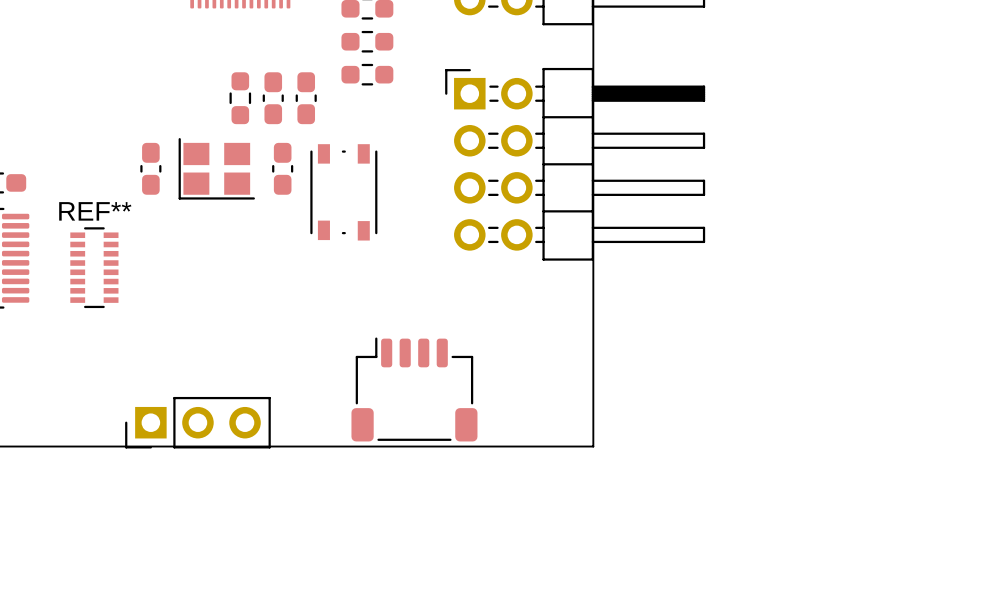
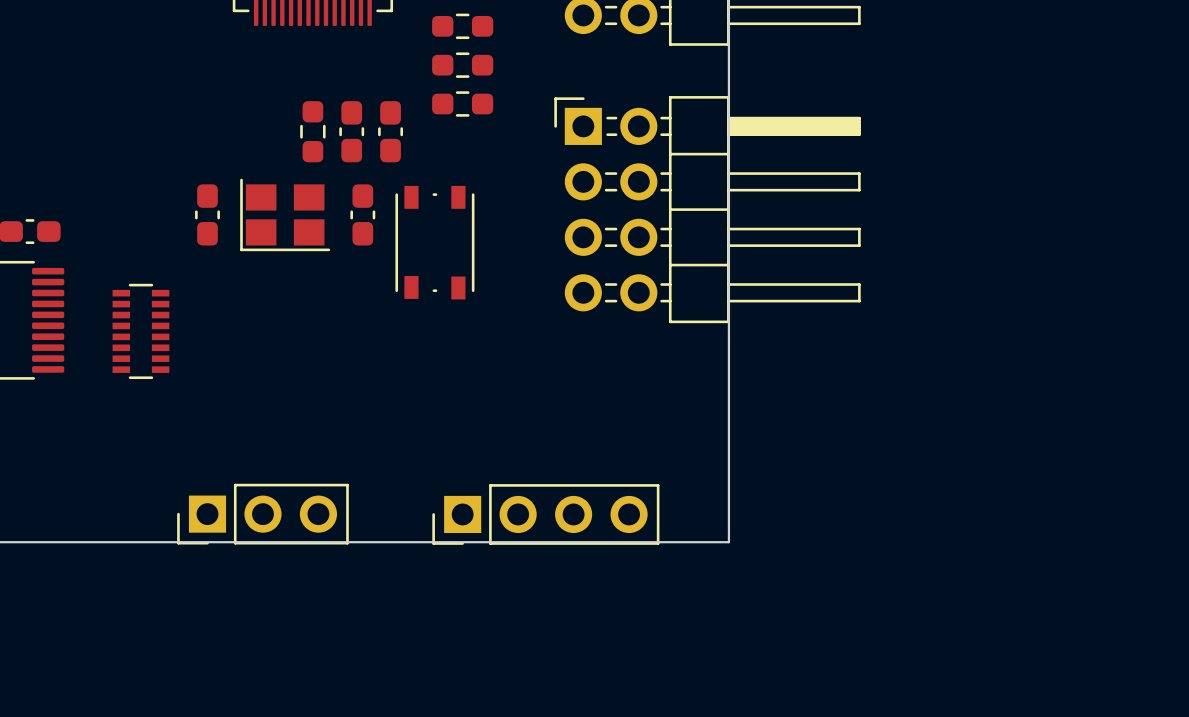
REF** name: REF** (95, 211) -> none
part: (414, 389) -> none
part: none -> (545, 514)

